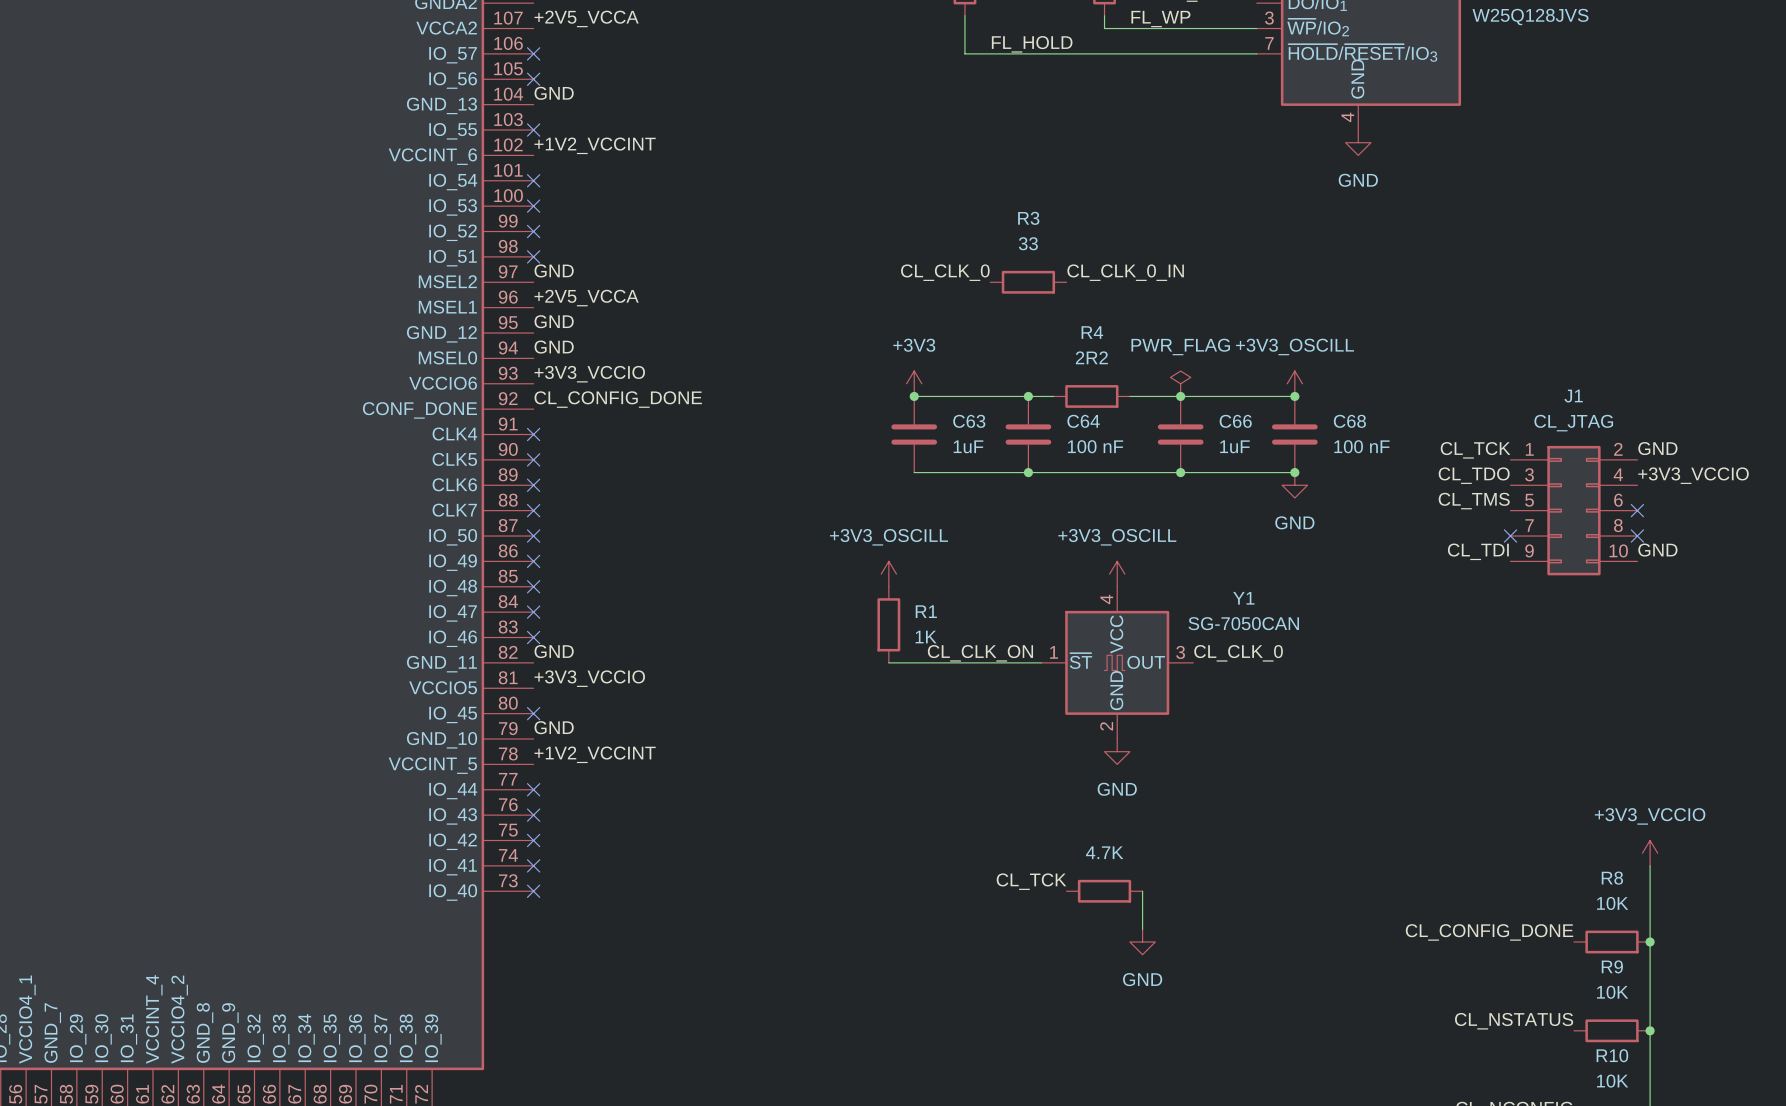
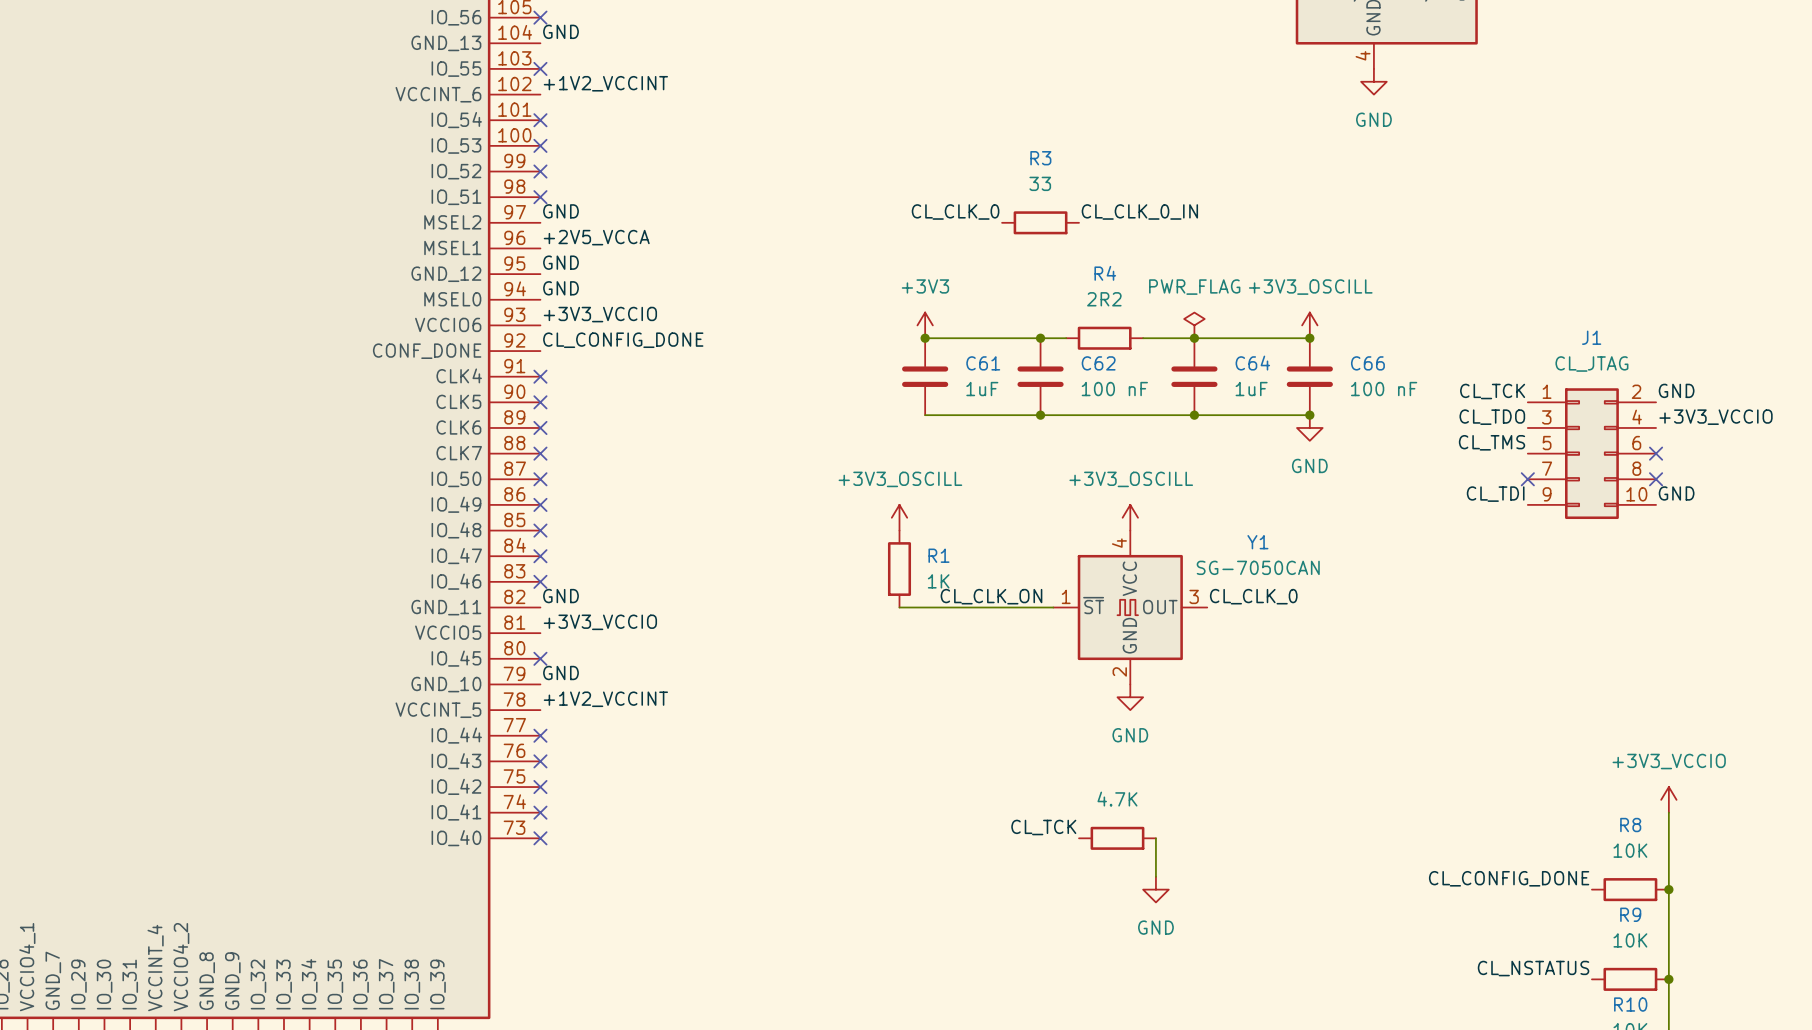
C63 name: C63 (969, 421) -> C61 (983, 363)
C64 name: C64 (1083, 421) -> C62 (1098, 363)
C66 name: C66 (1235, 421) -> C64 (1252, 363)
C68 name: C68 (1349, 421) -> C66 (1367, 363)

